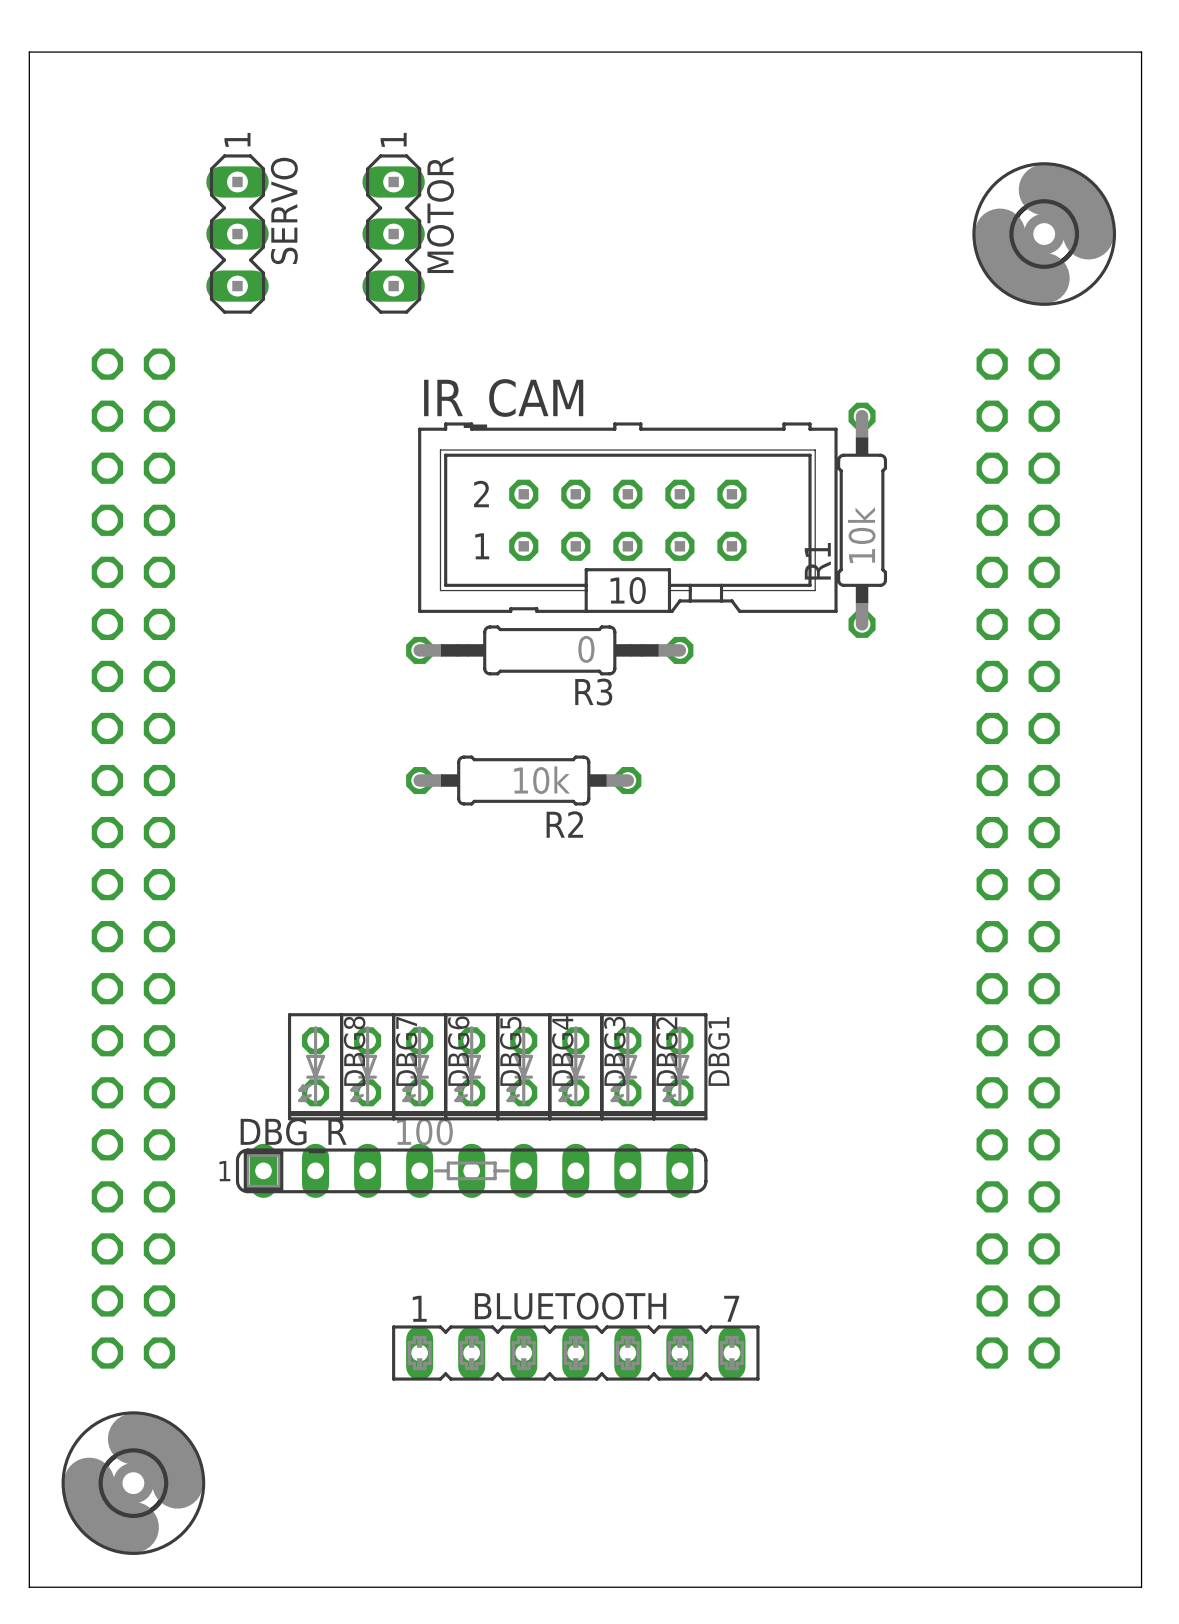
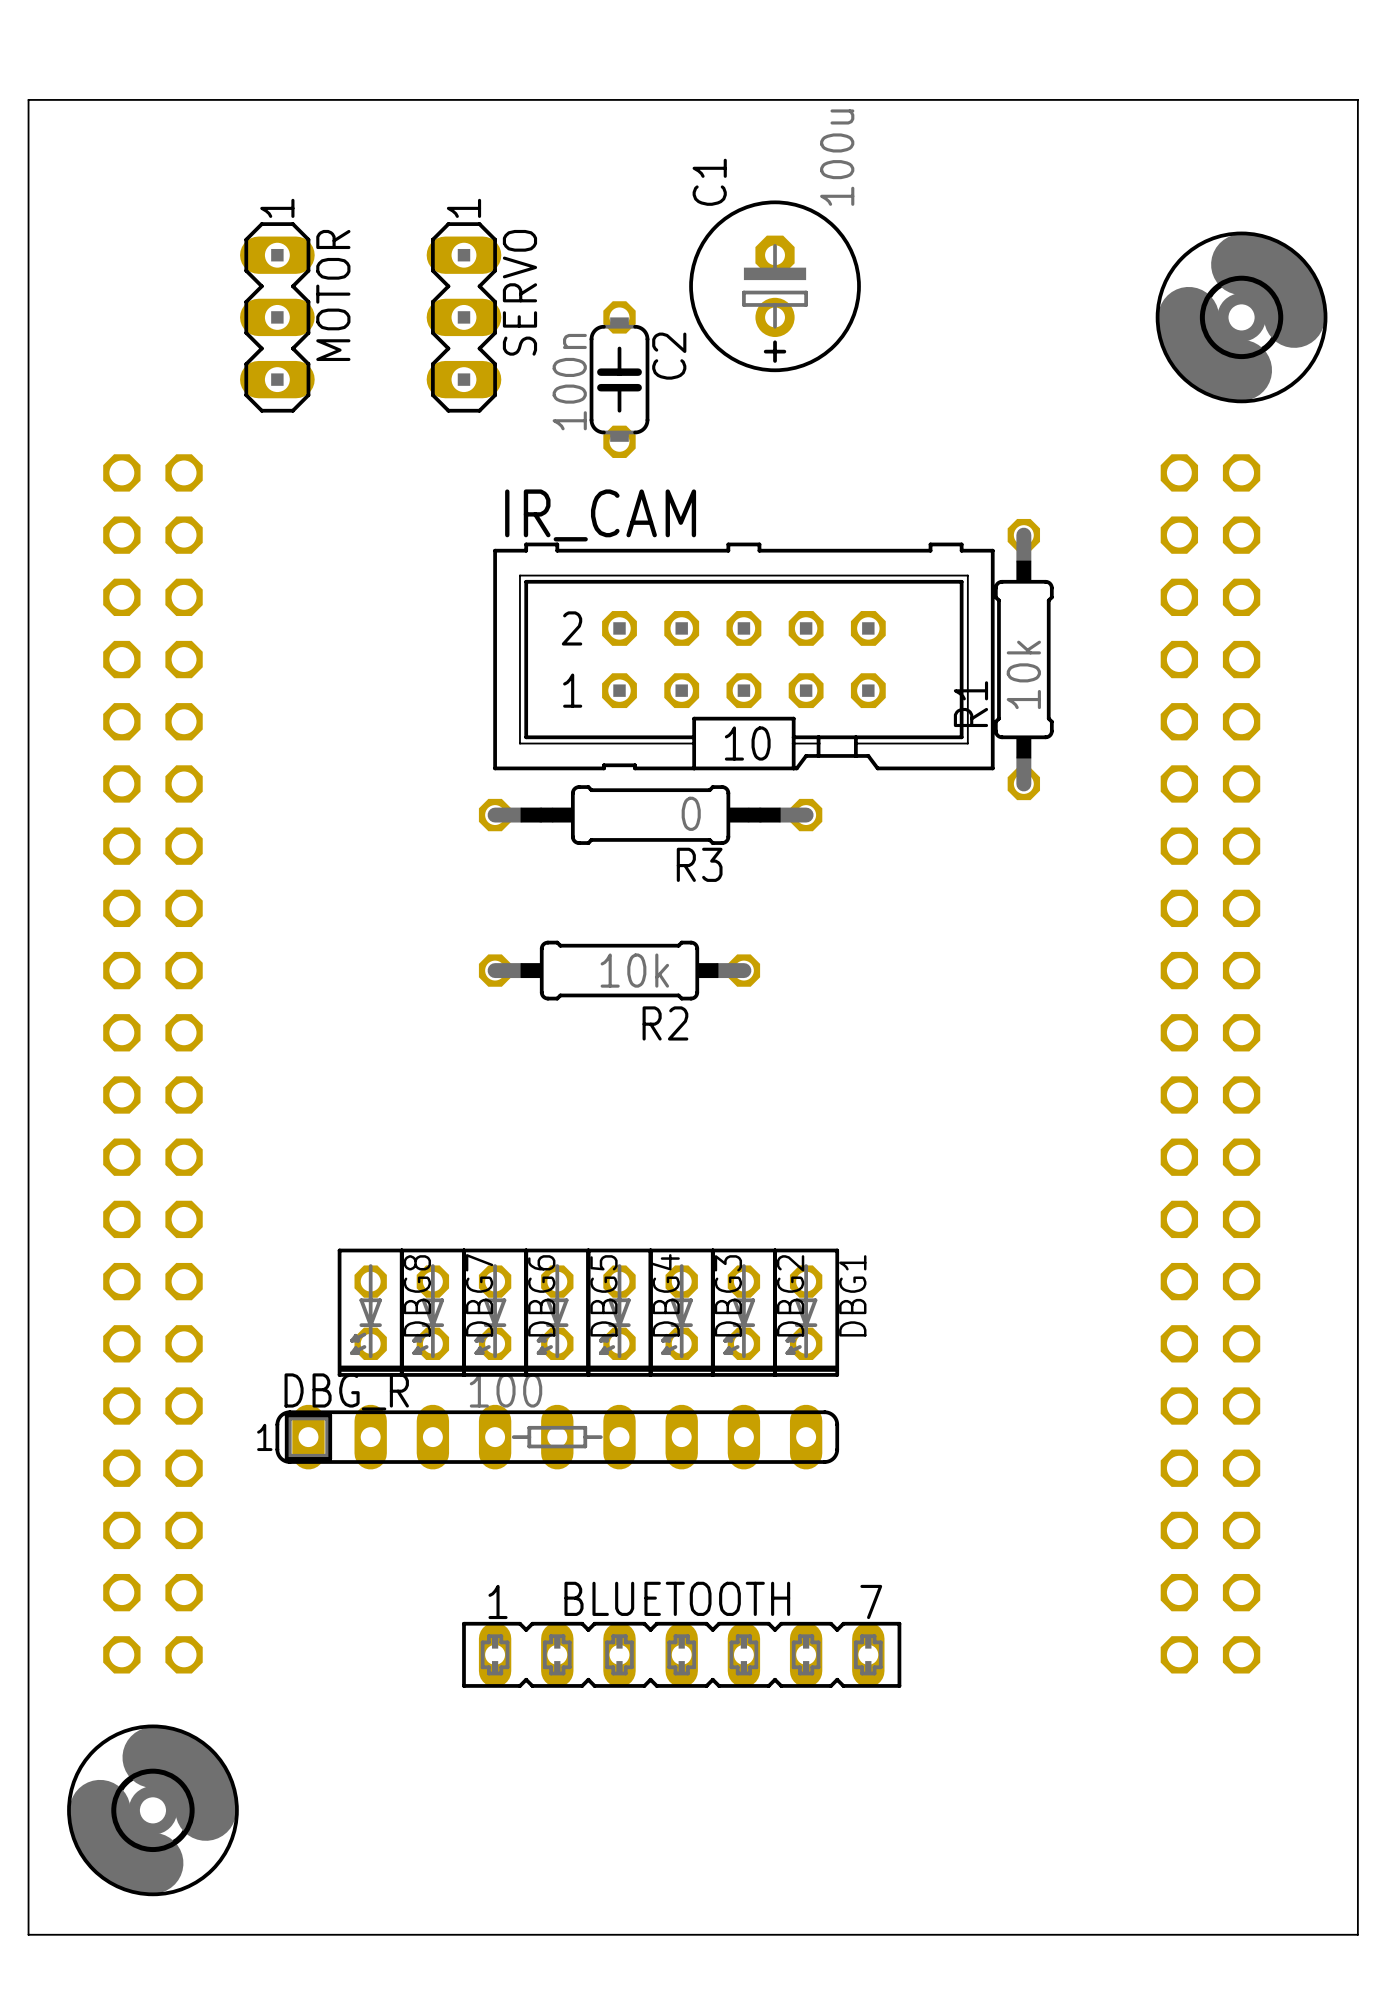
C1: none -> 100u (775, 286)
SERVO name: SERVO (284, 210) -> MOTOR (333, 295)
MOTOR name: MOTOR (440, 214) -> SERVO (519, 292)
C2: none -> 100n (619, 379)

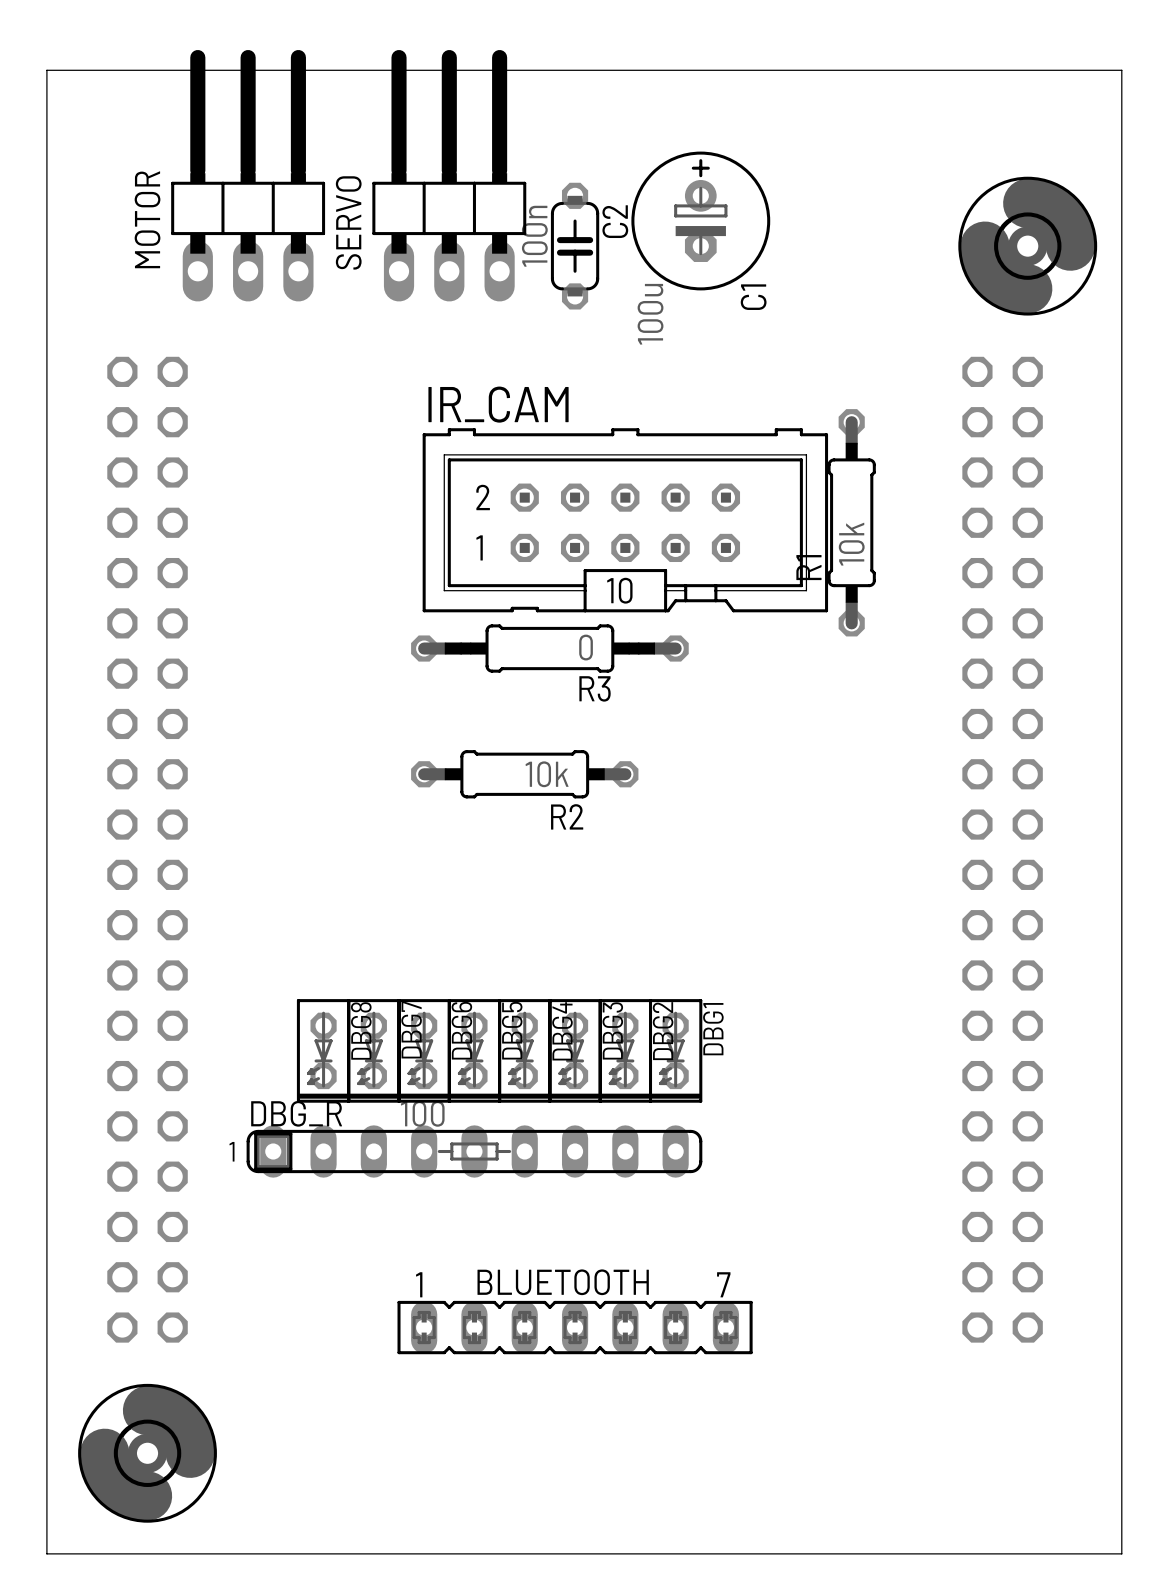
MOTOR: none -> (248, 175)
SERVO: none -> (449, 175)
C1 rotation: 0° (775, 286) -> 180° (700, 220)
MOTOR: (277, 317) -> none
SERVO: (463, 317) -> none
C2 position: (619, 379) -> (575, 246)

